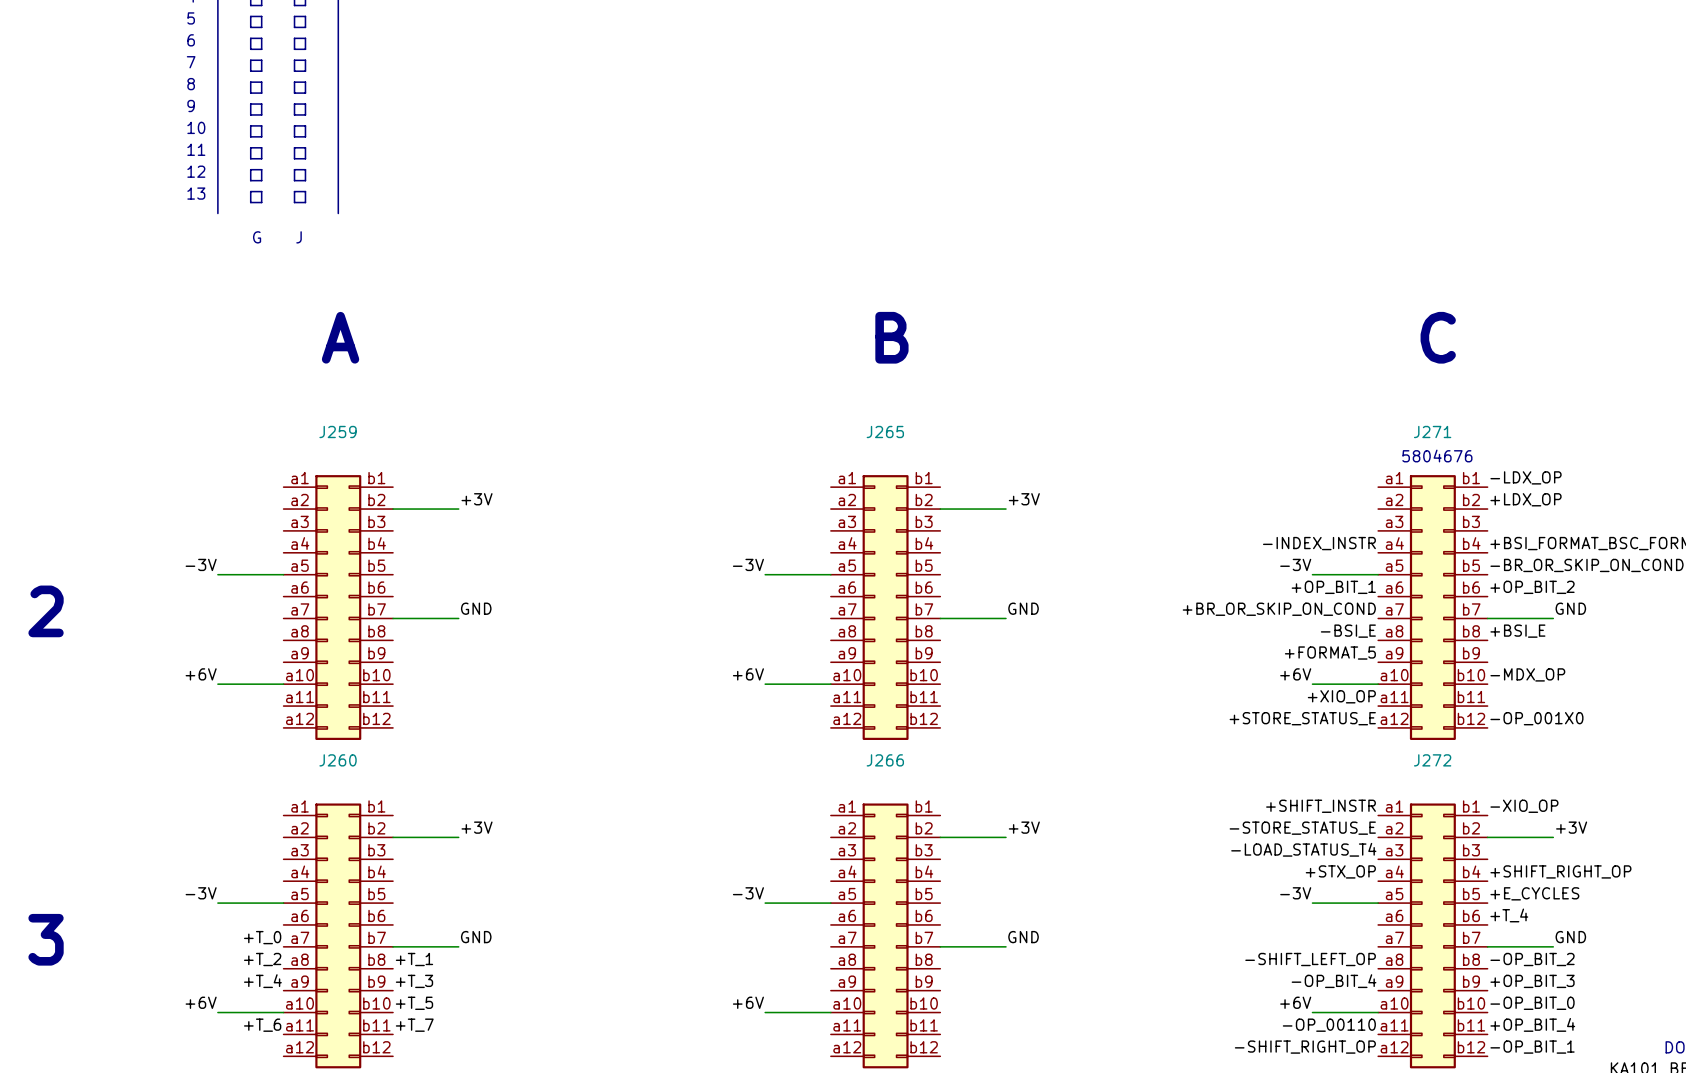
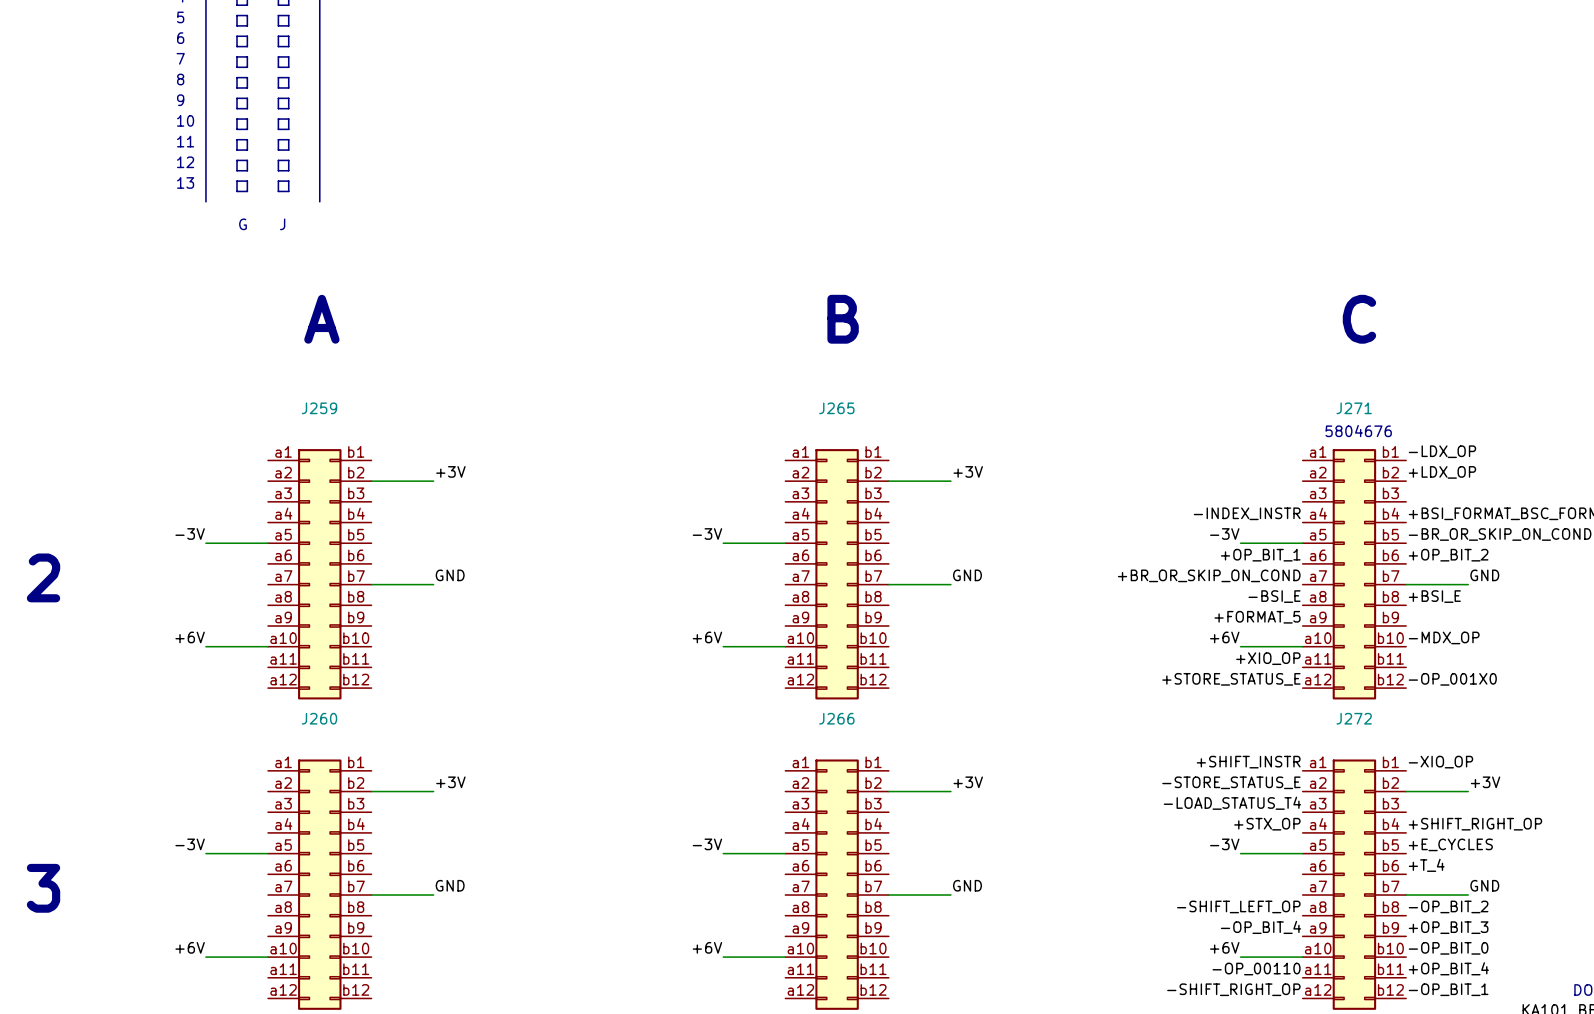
label: +T_0 (262, 937) -> none
label: +T_2 (262, 959) -> none
label: +T_1 (414, 959) -> none
label: +T_4 (262, 981) -> none
label: +T_3 (414, 981) -> none
label: +T_5 (414, 1003) -> none
label: +T_6 (262, 1025) -> none
label: +T_7 (414, 1025) -> none

